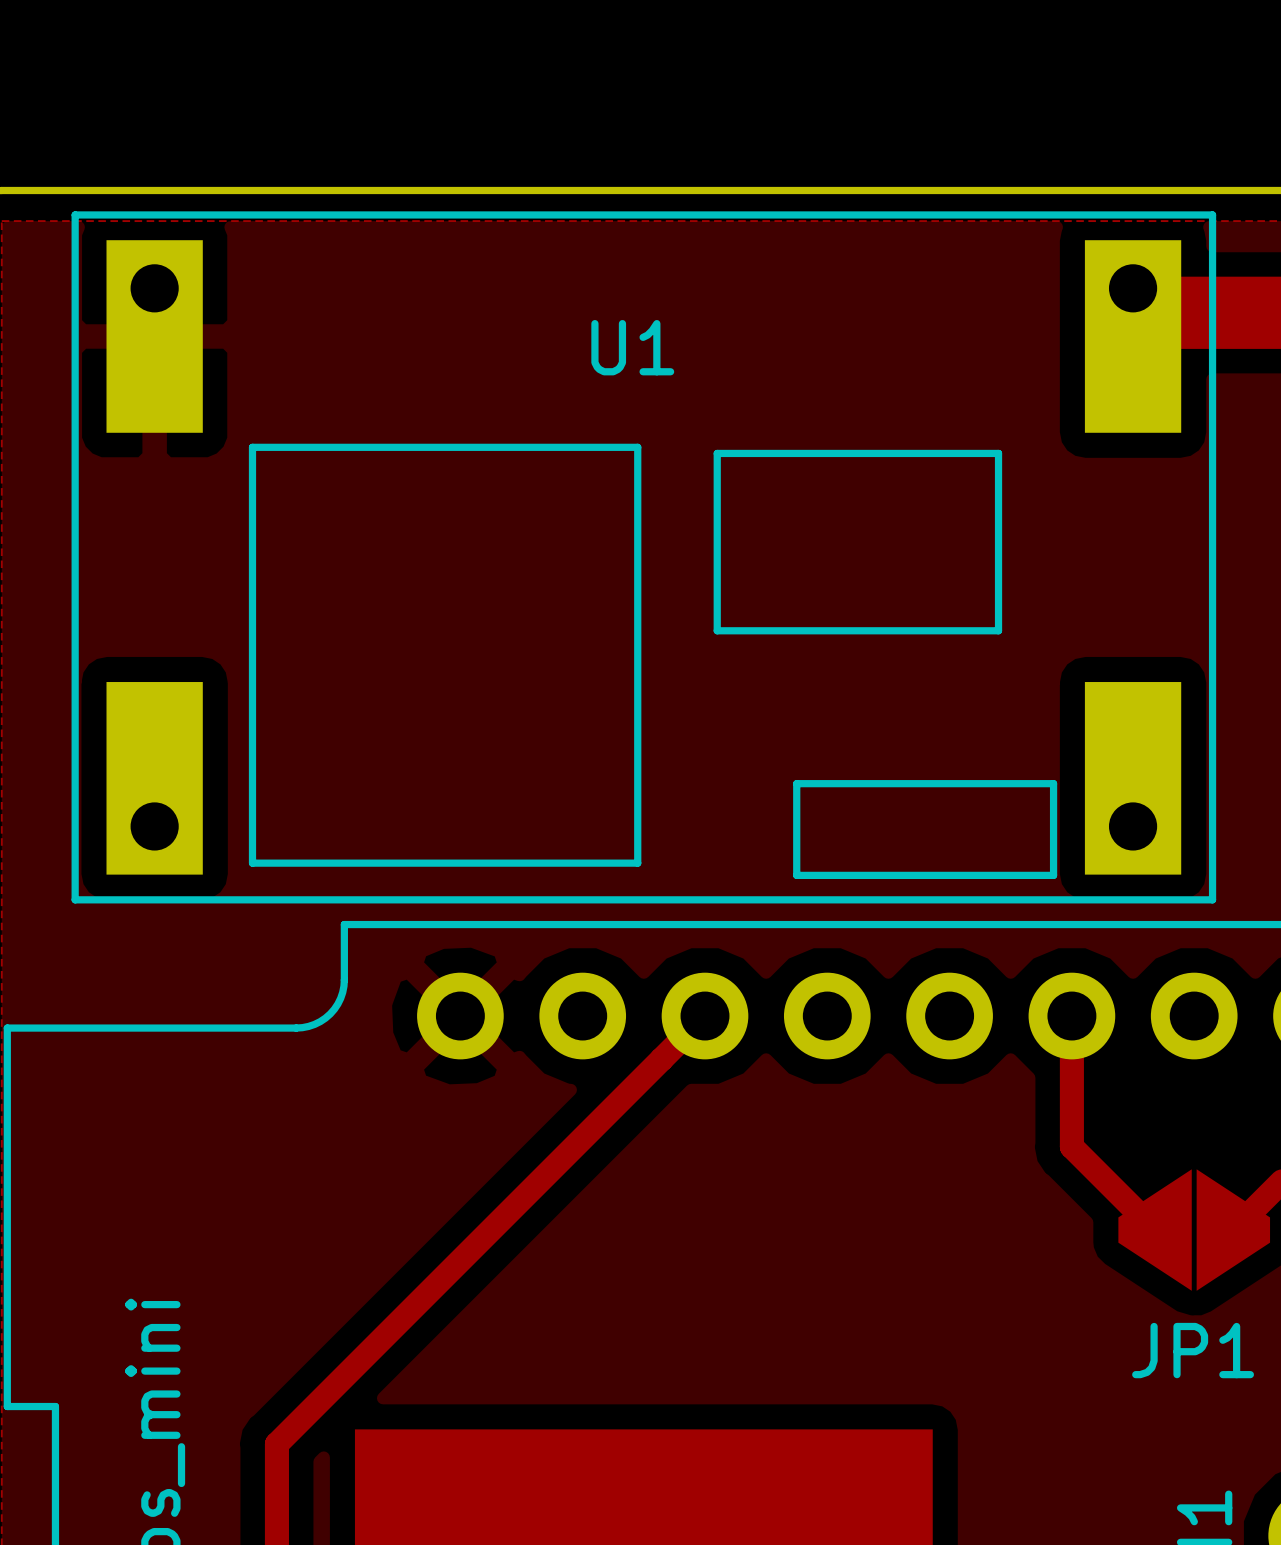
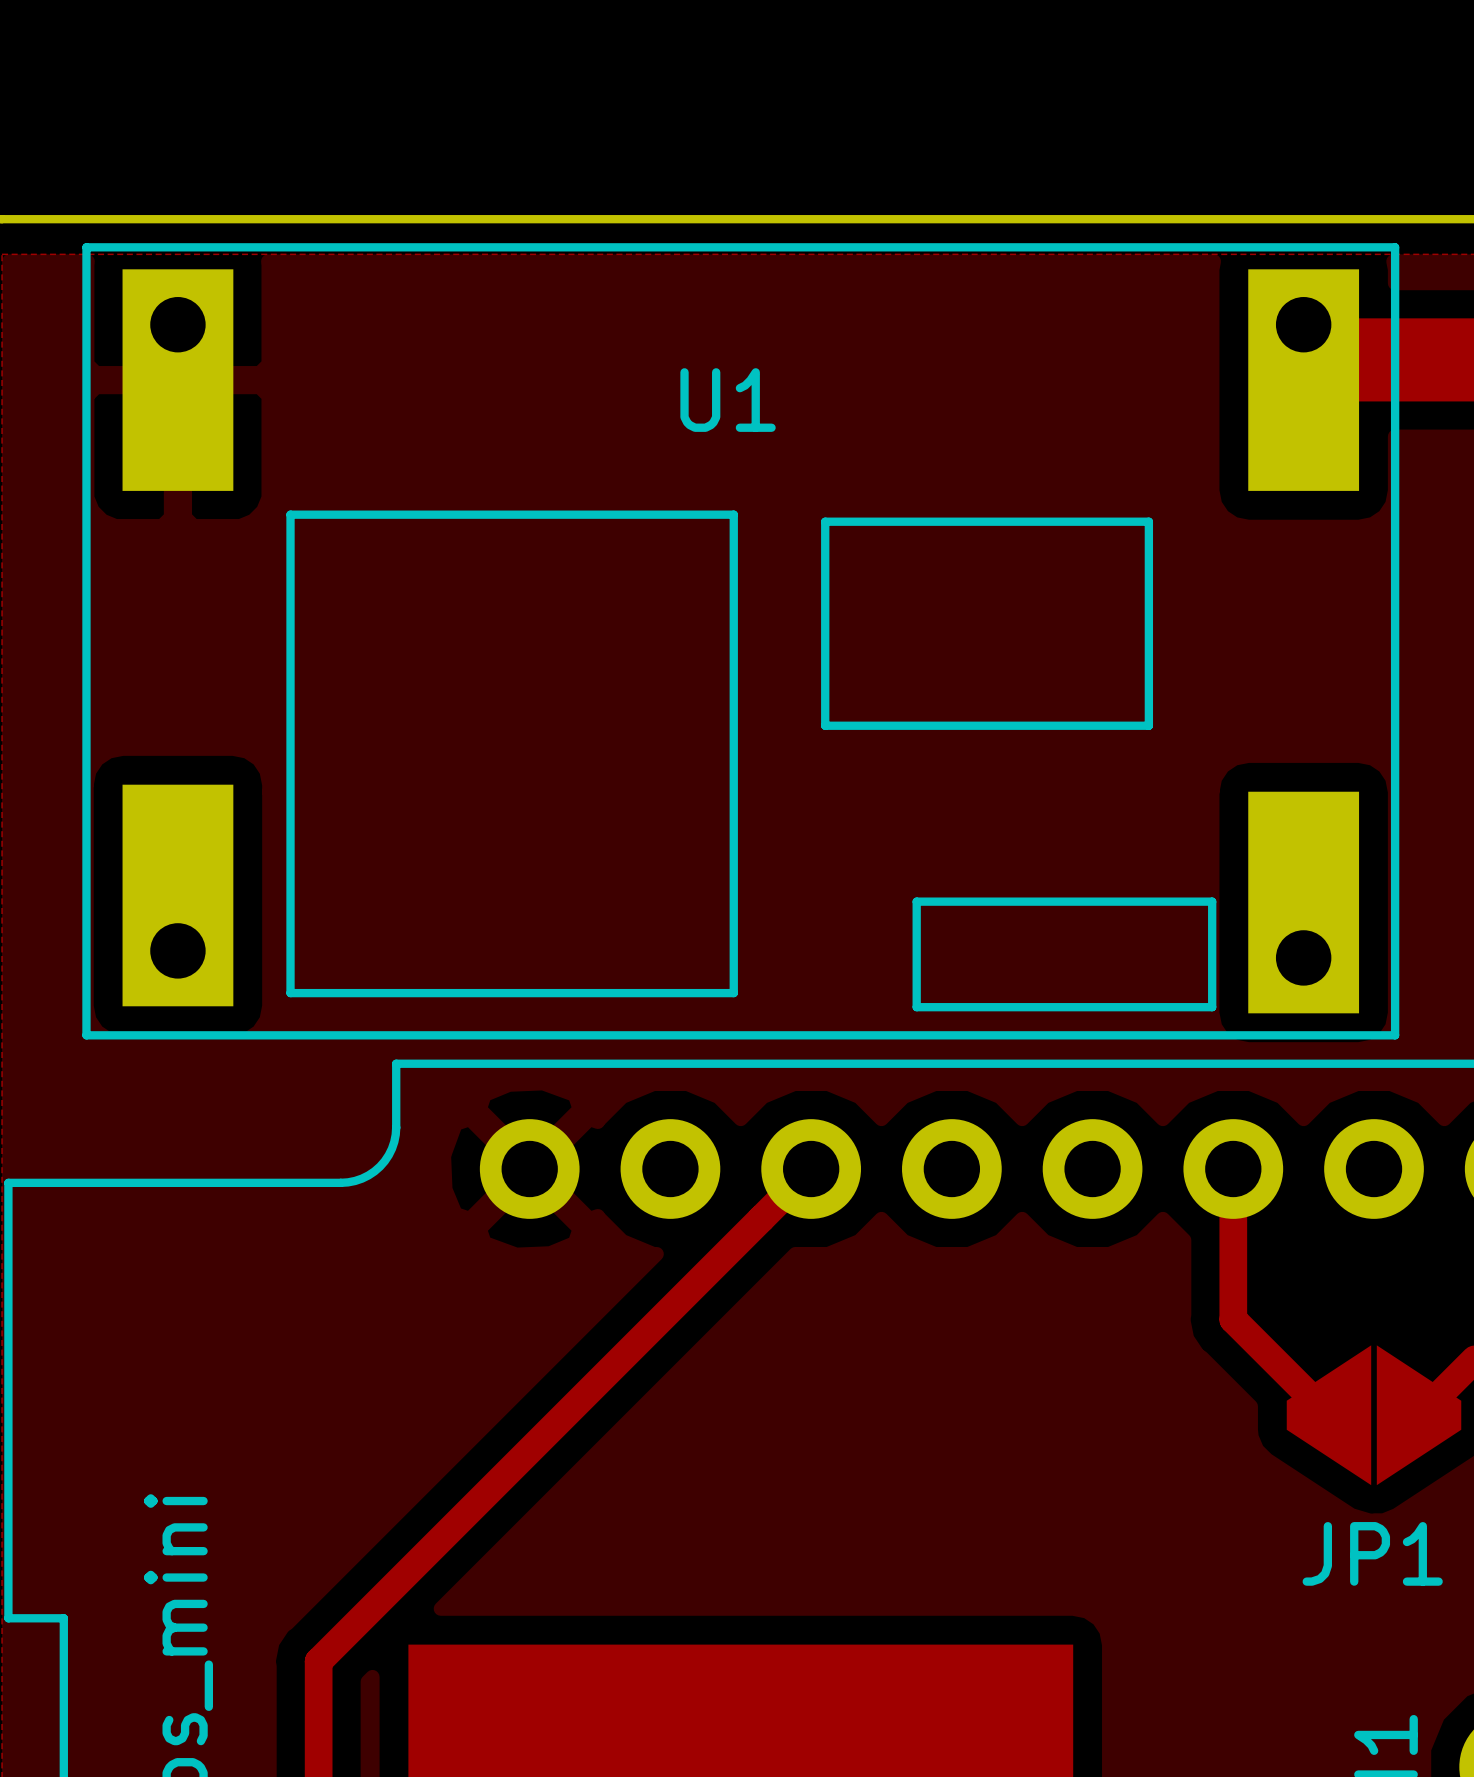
U1 footprint: [71, 211, 1217, 904] -> [82, 243, 1400, 1040]

